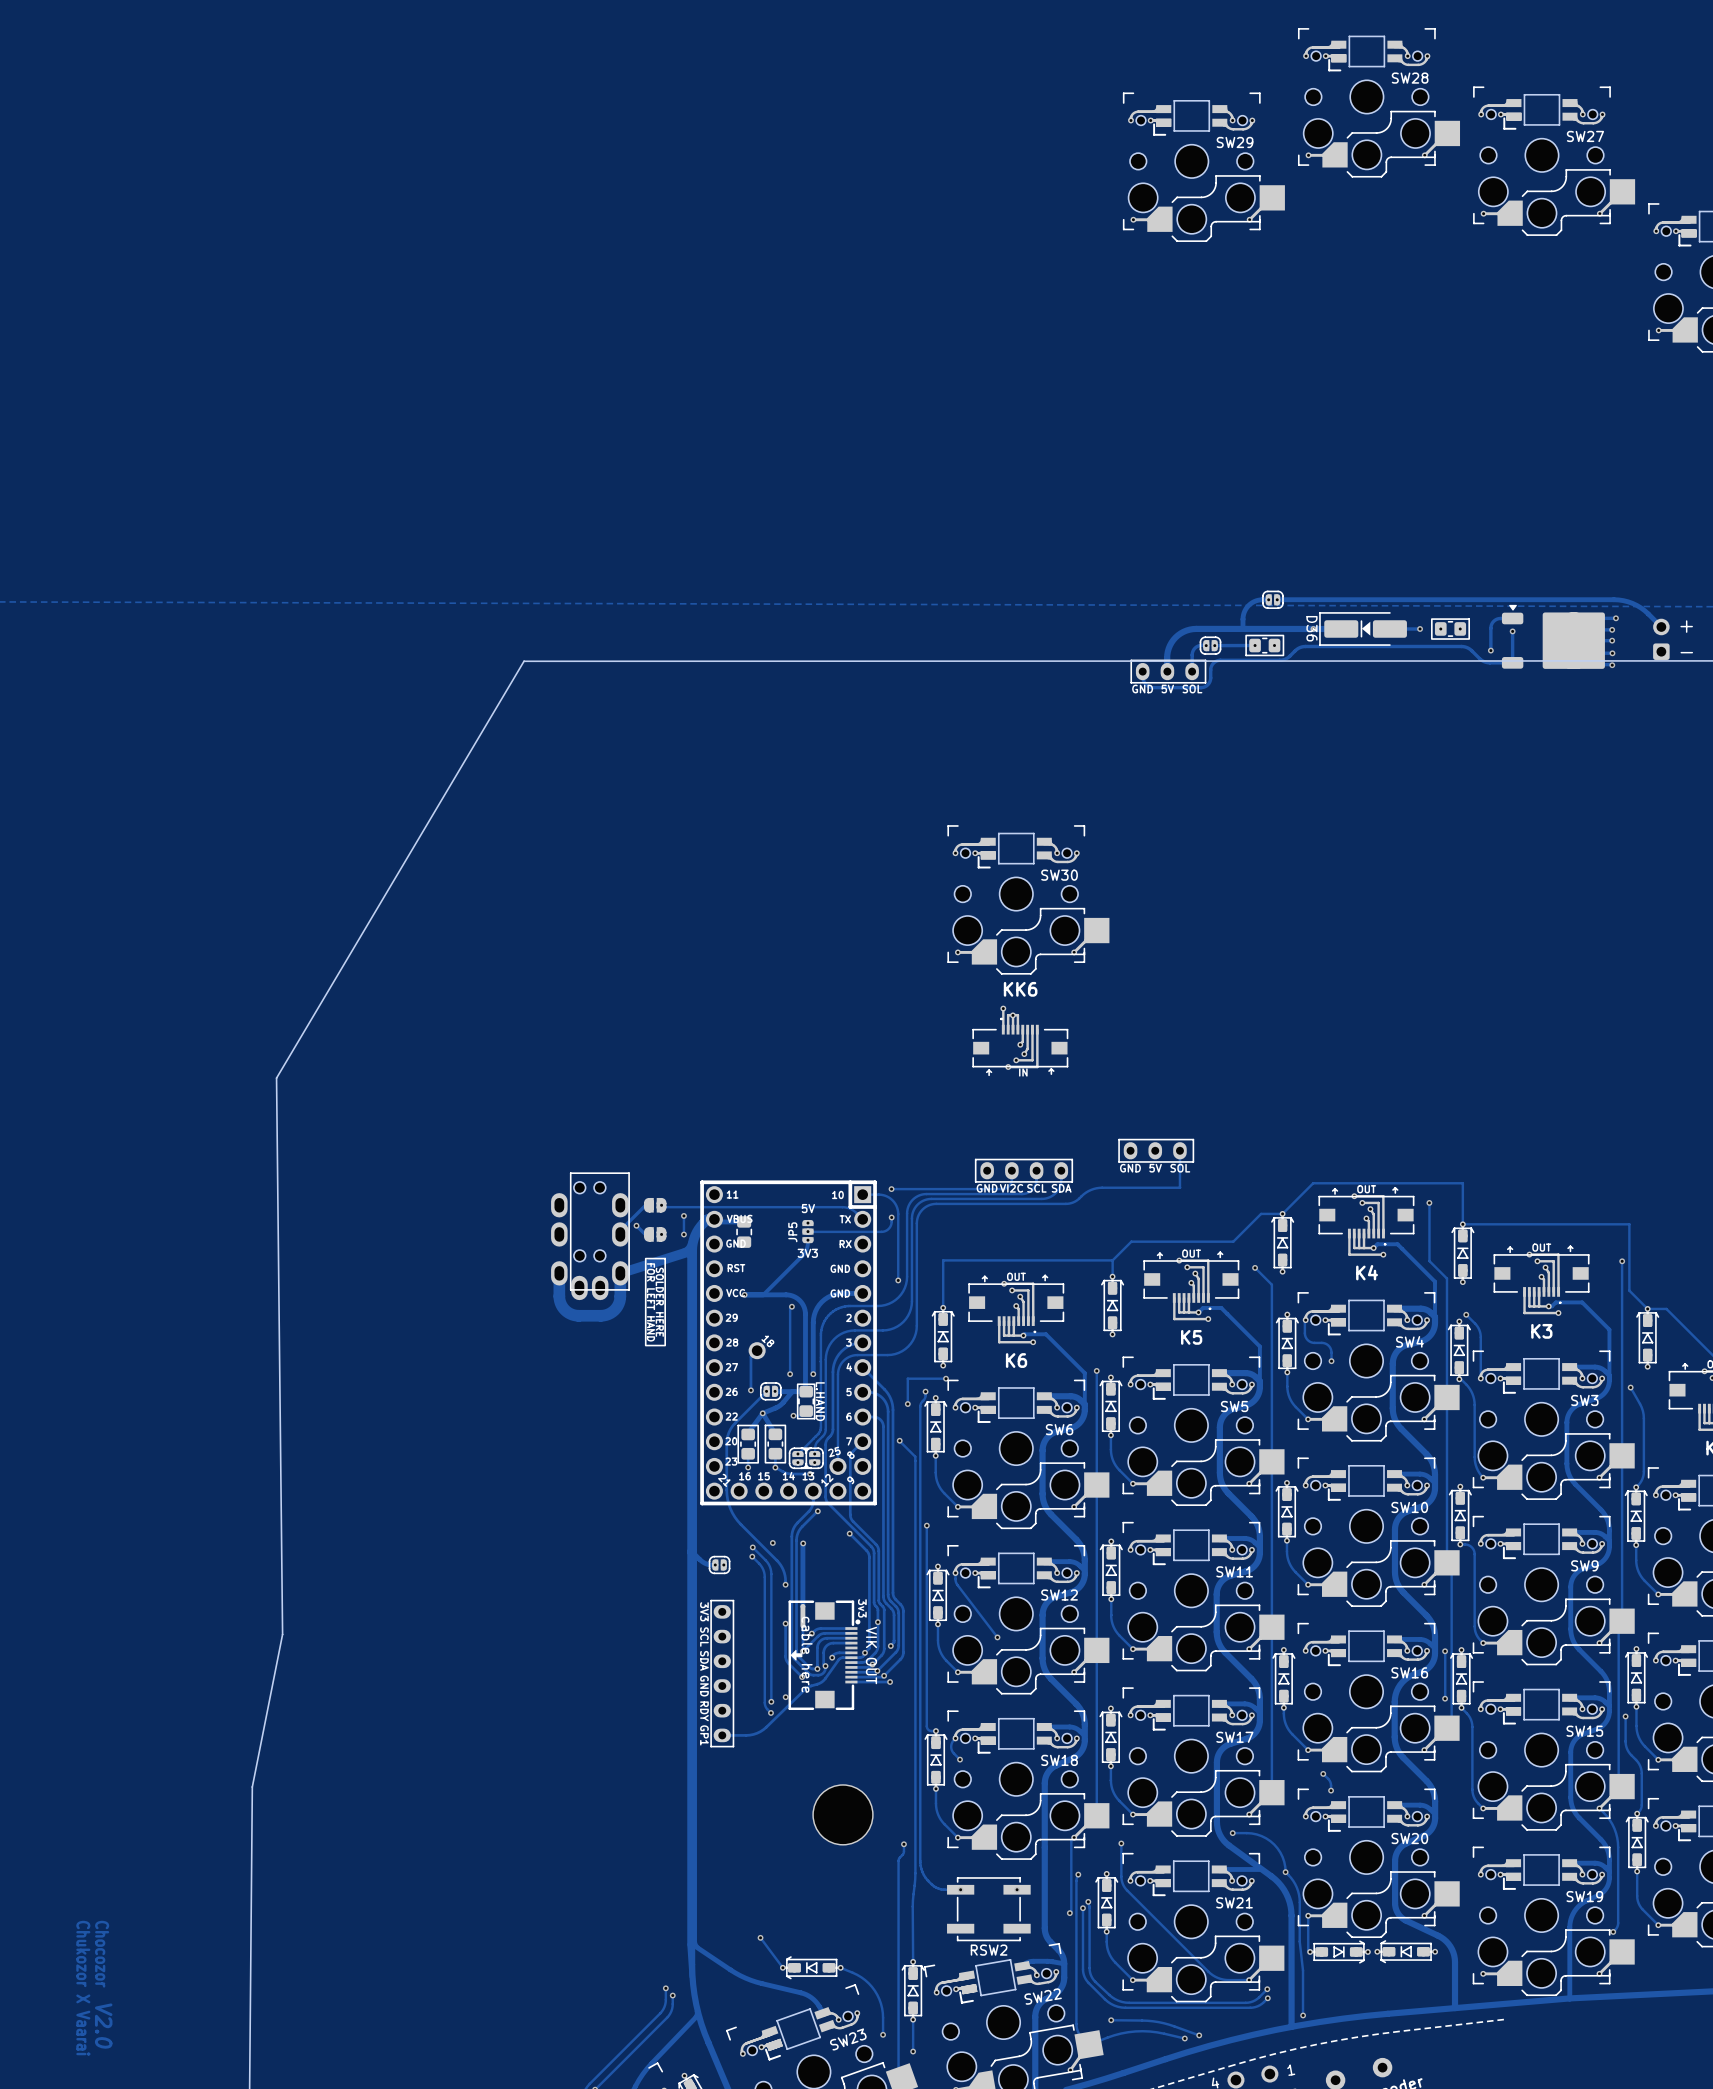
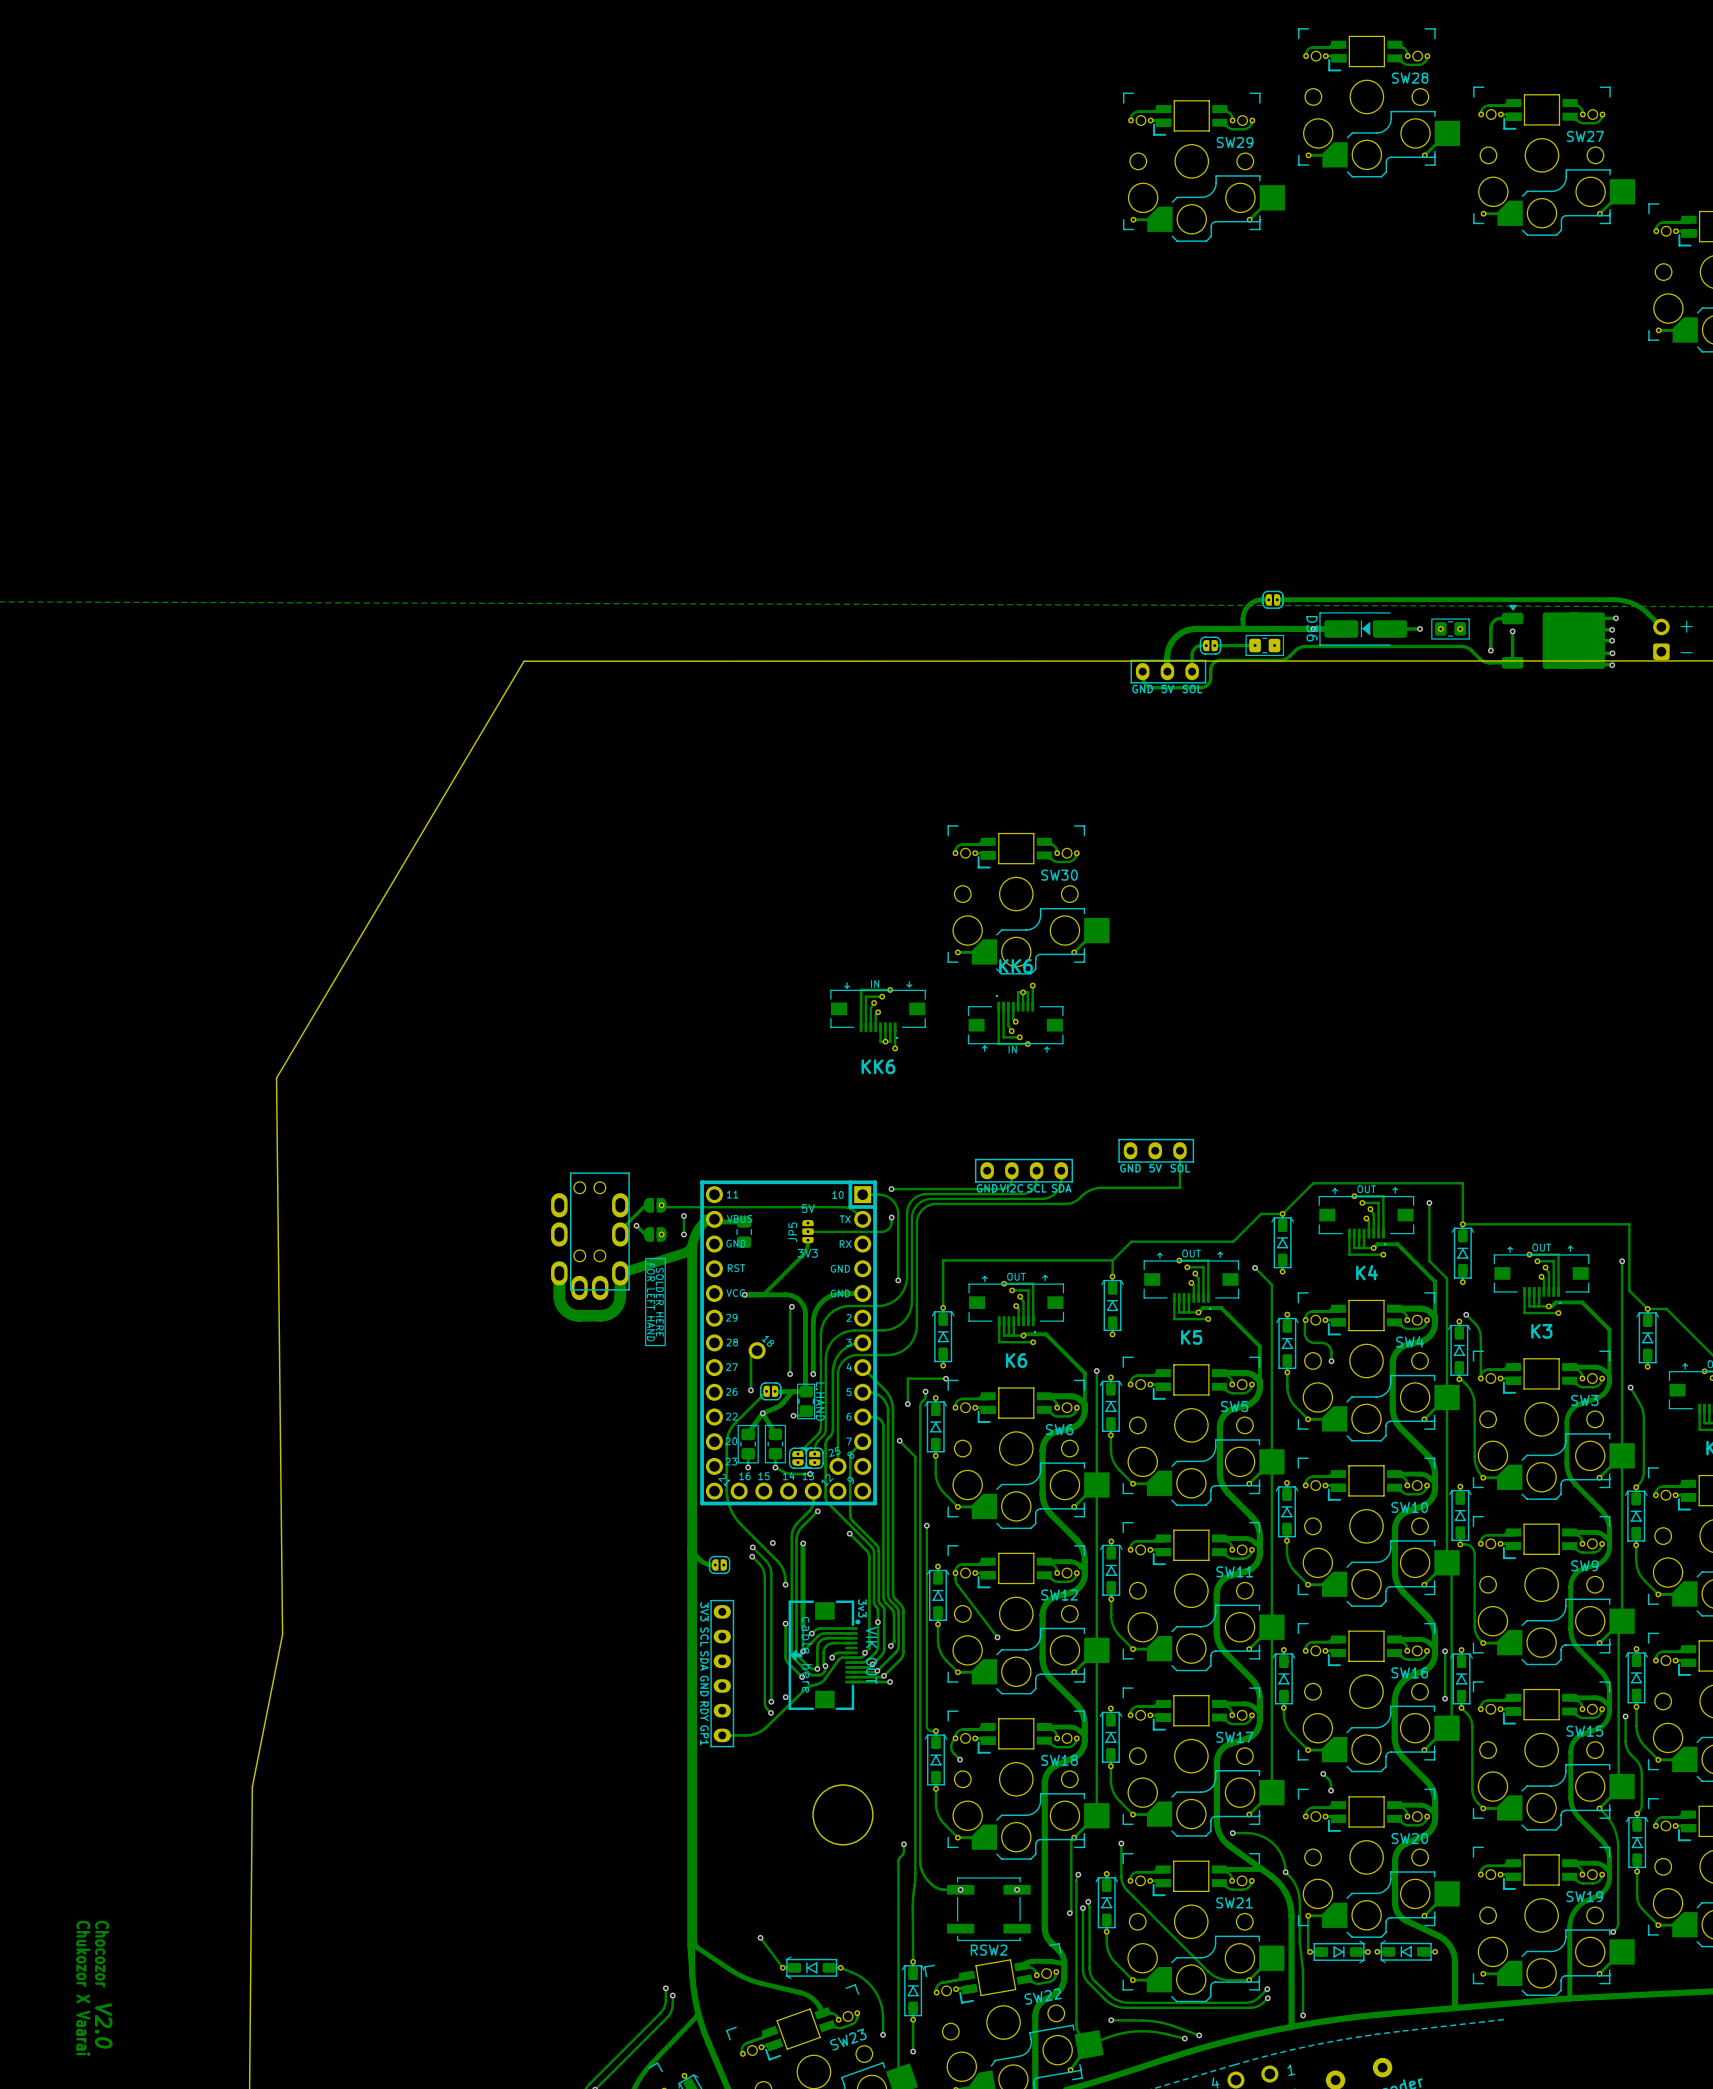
KK6: none -> (878, 1016)
KK6 side: bottom (1020, 1040) -> top (1015, 1017)

